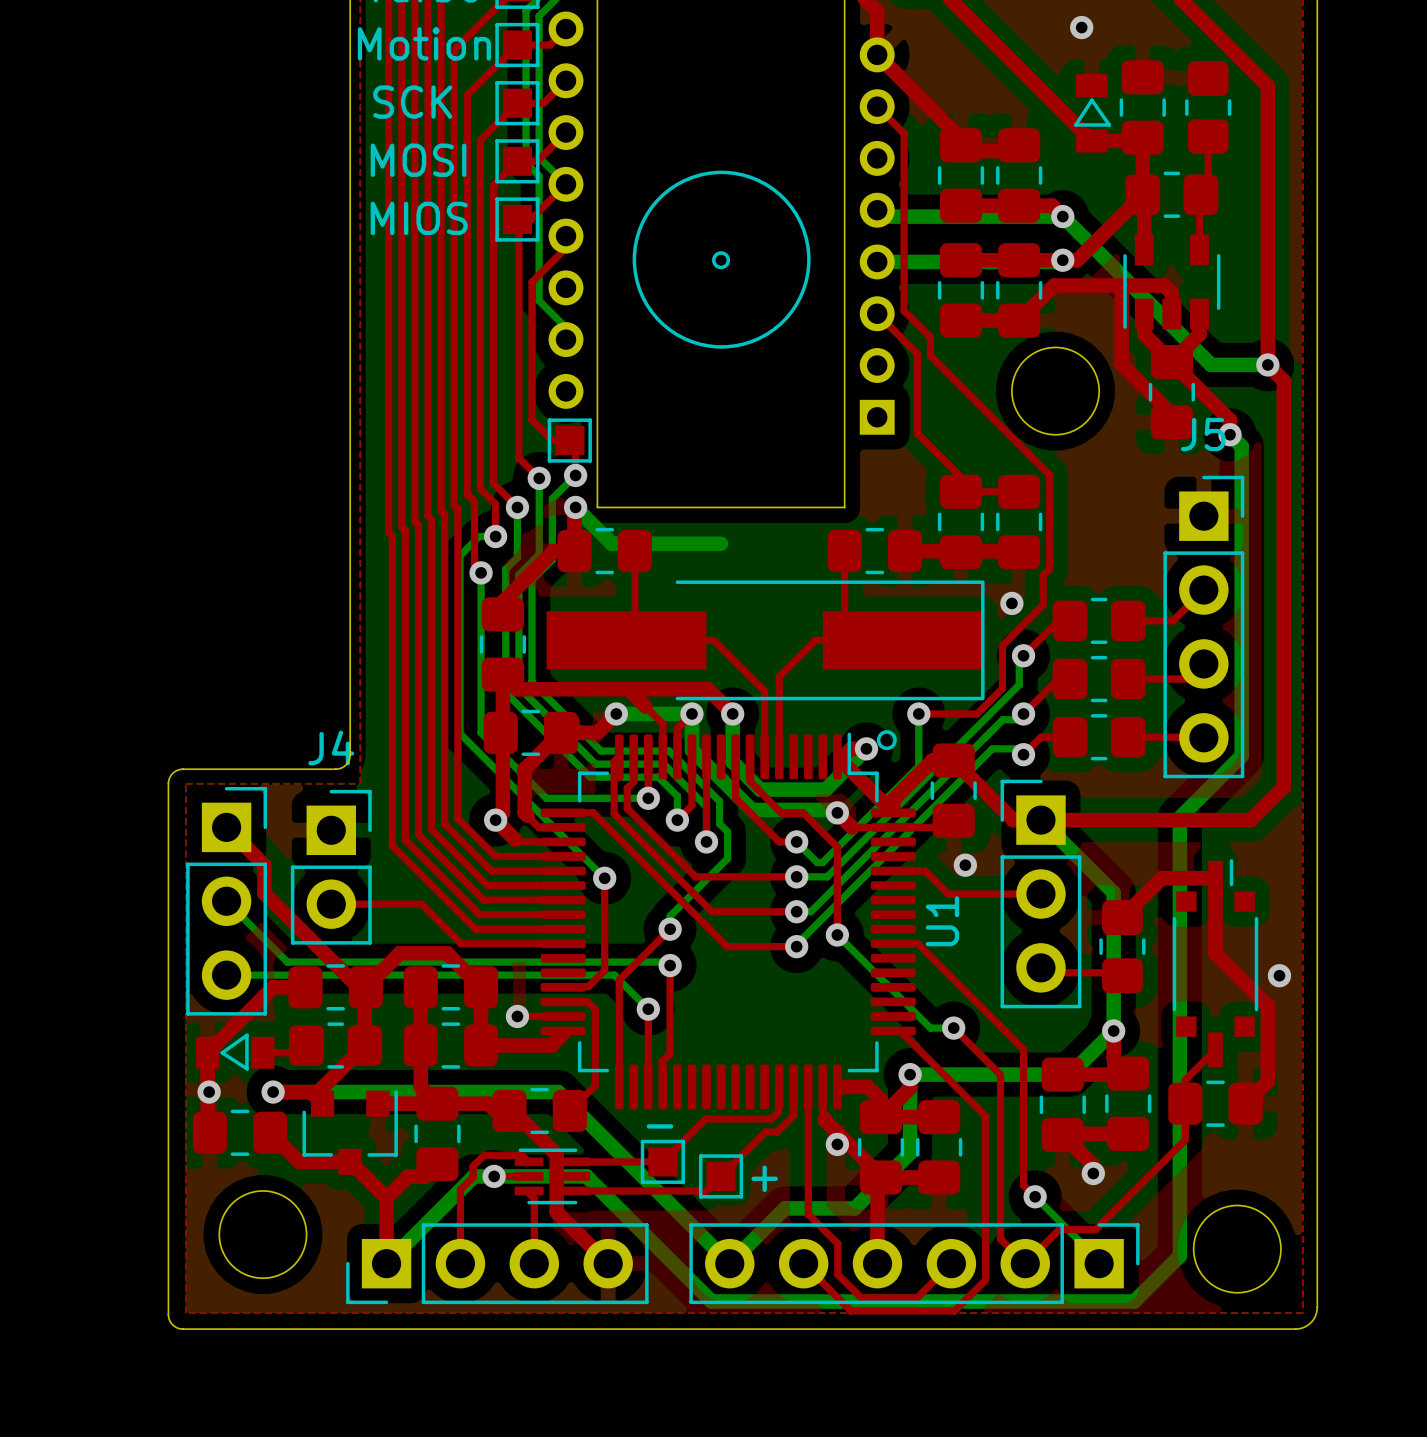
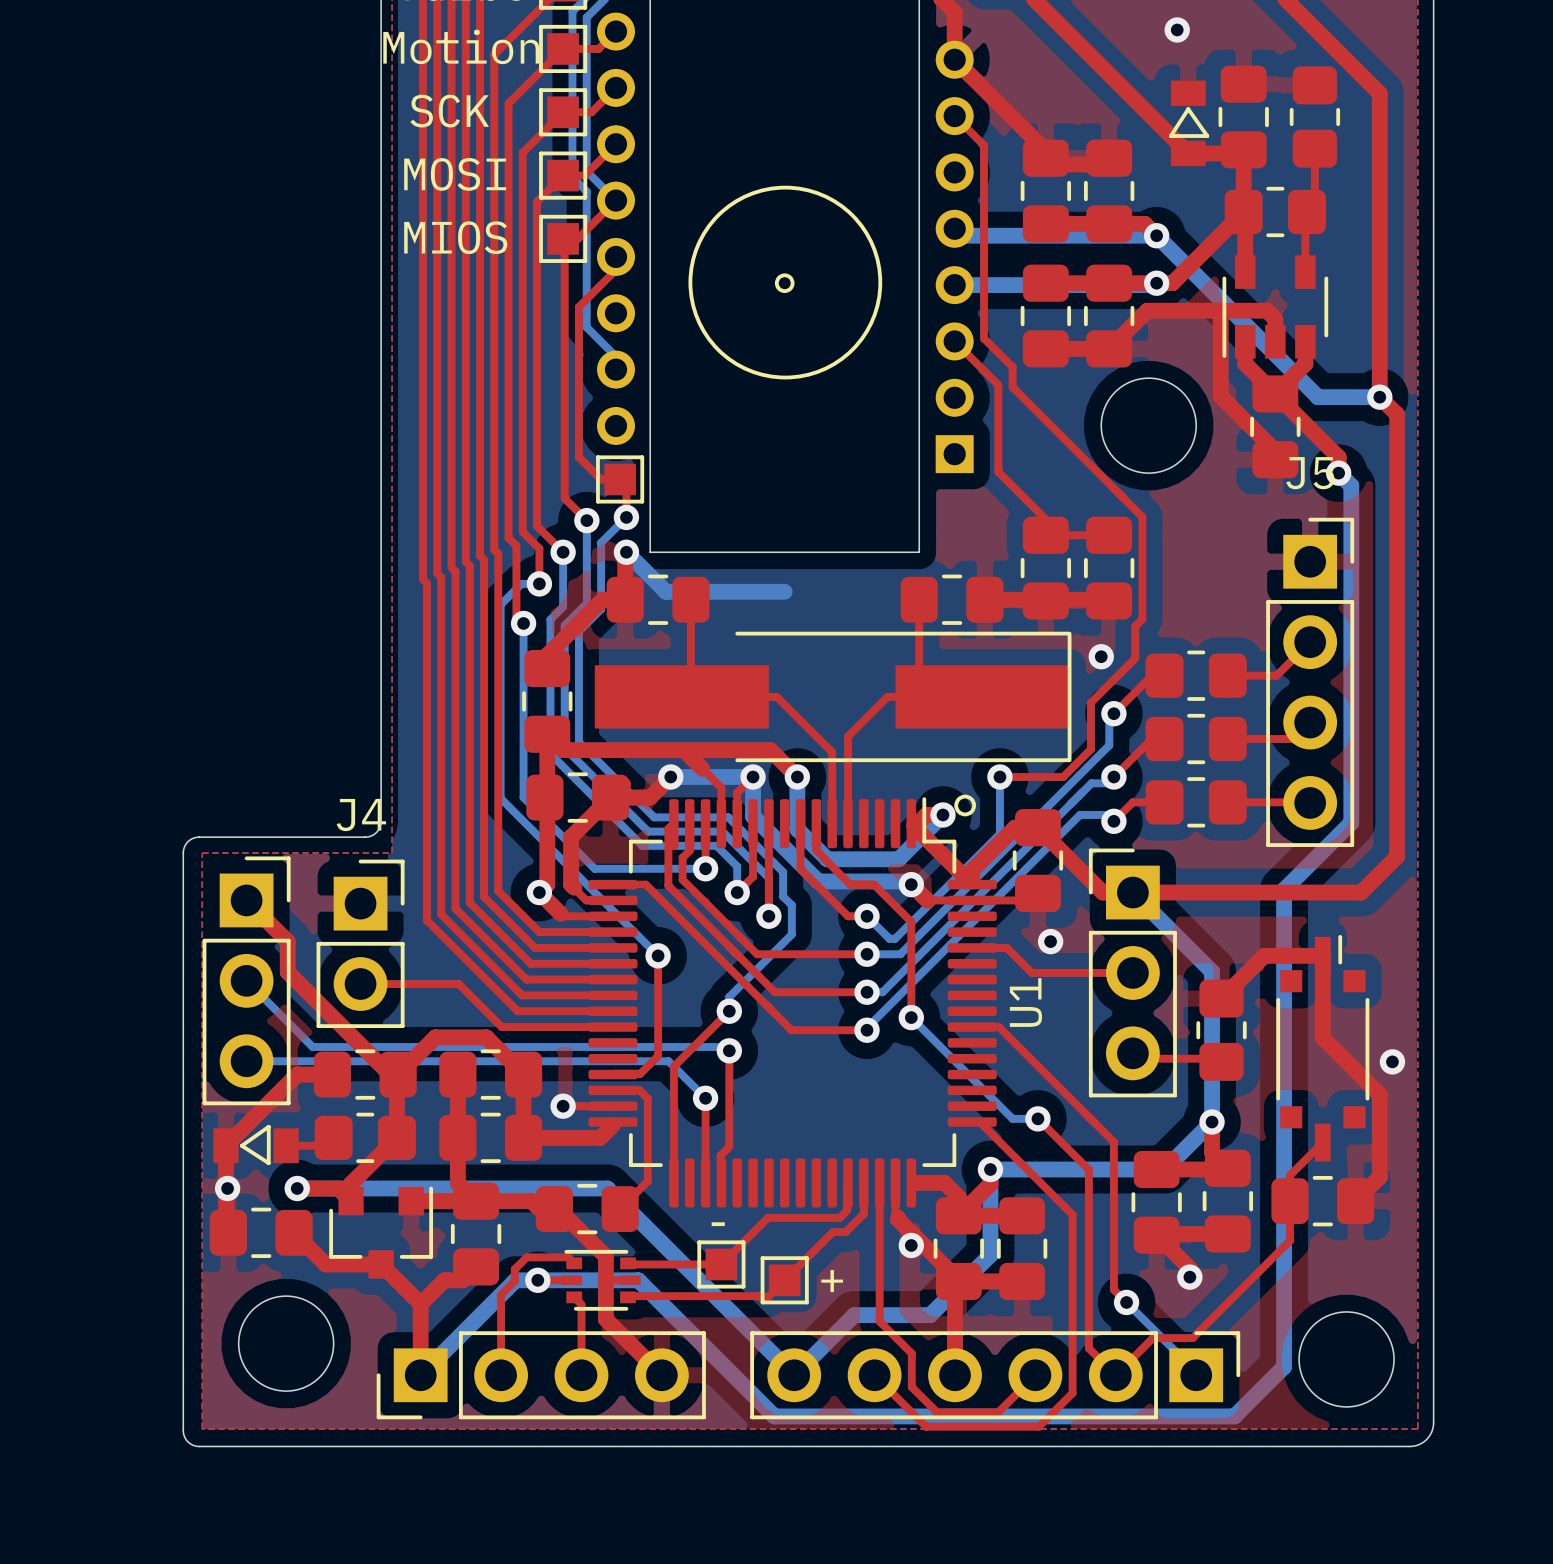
part footprint: [514, 1148, 591, 1205] -> [561, 1249, 641, 1311]

